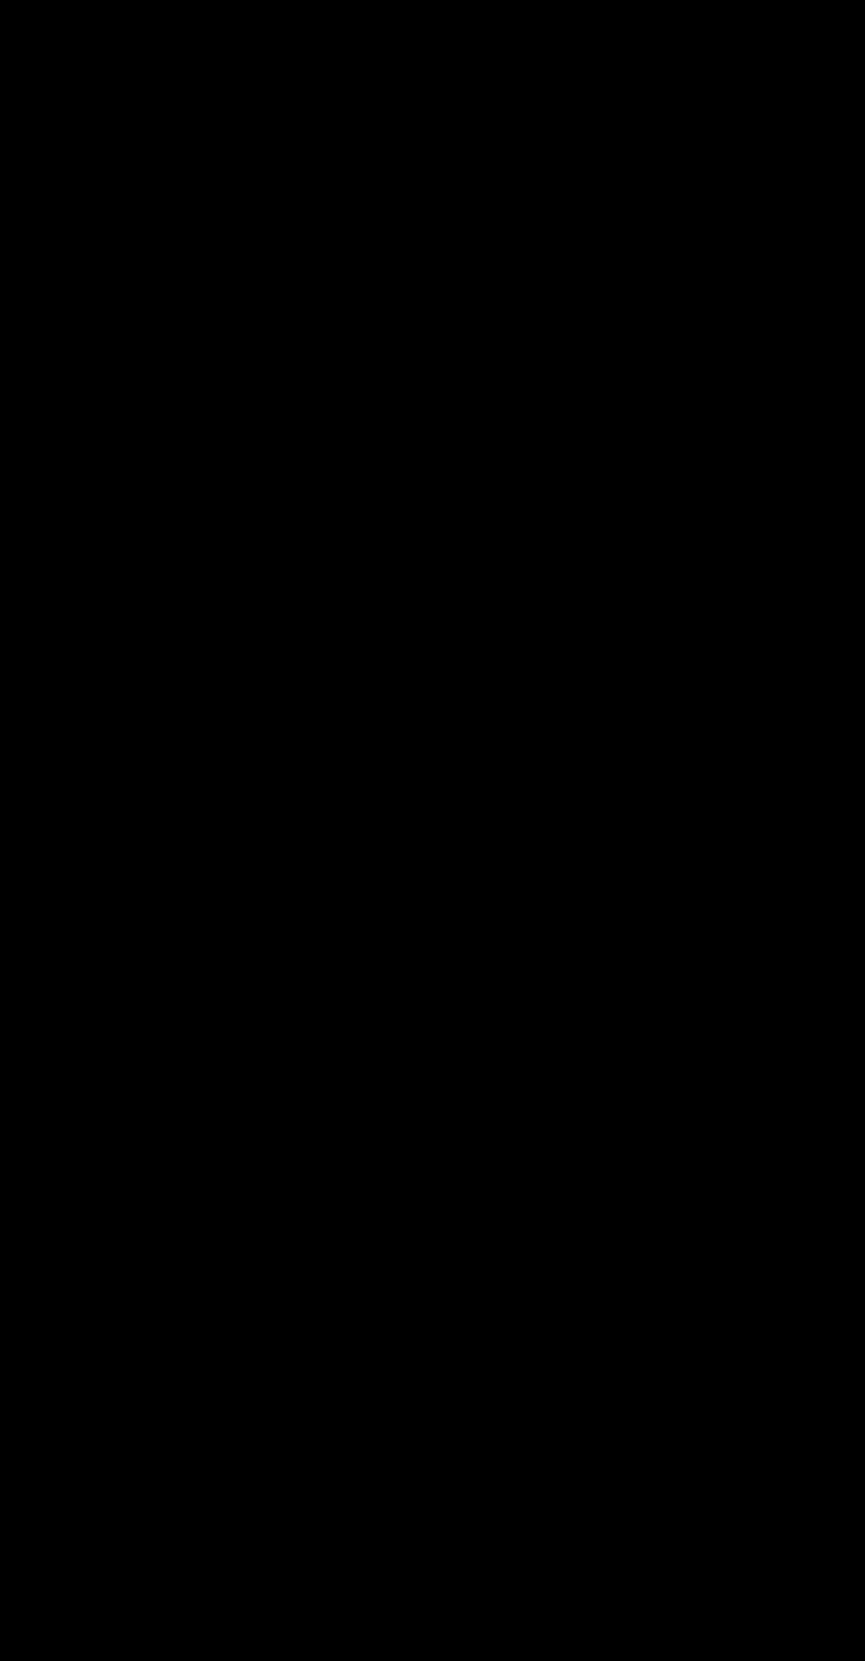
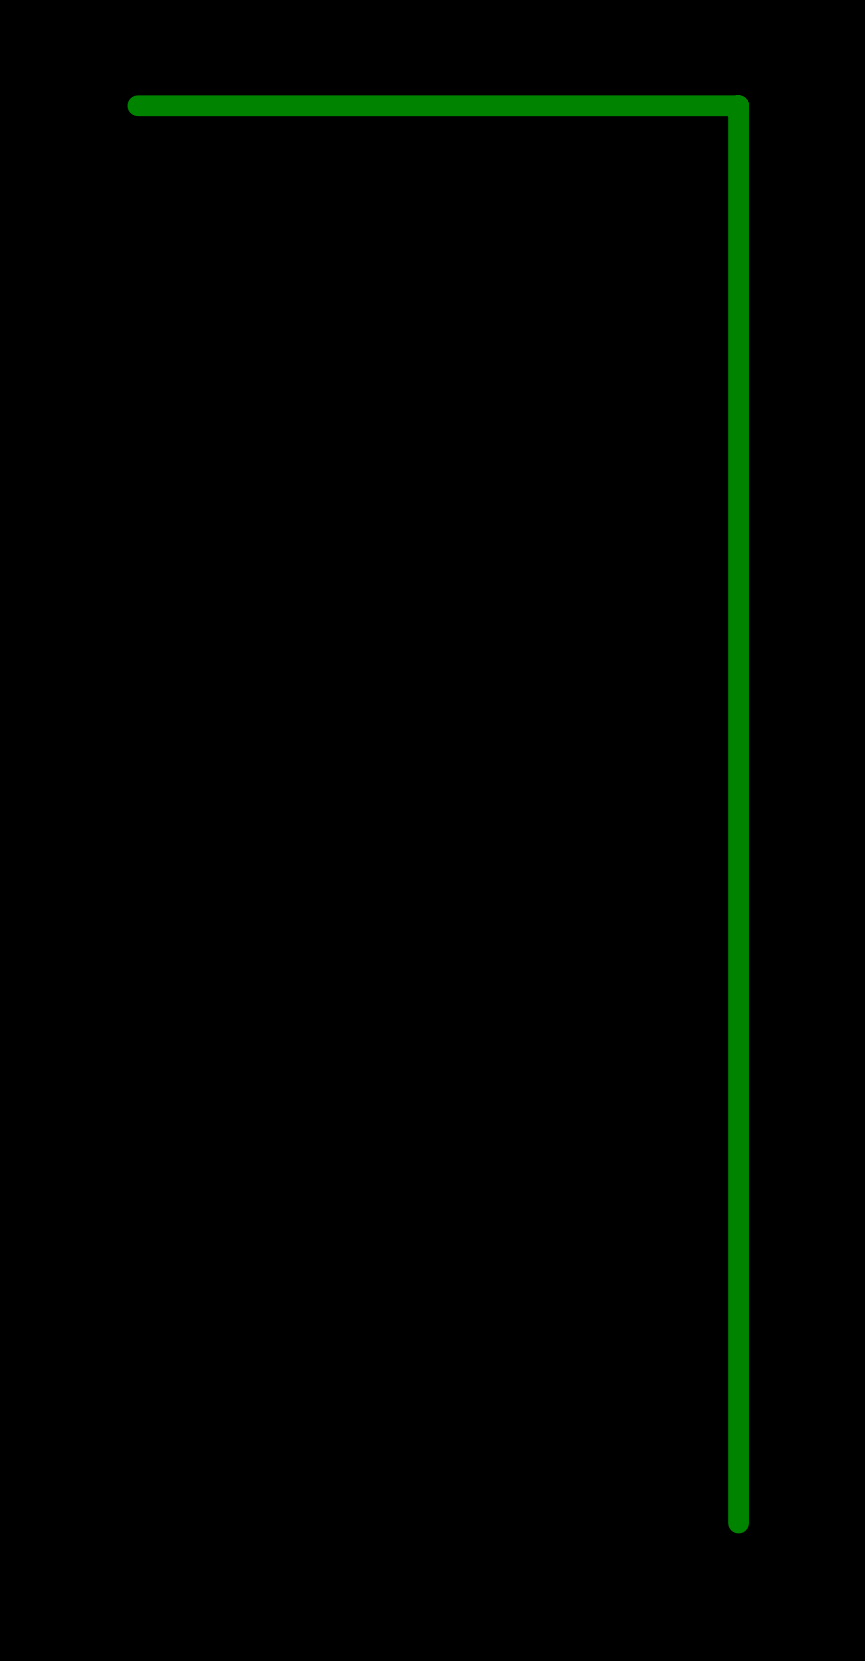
bottom track: none -> (137, 105) (738, 105) (738, 1523)

